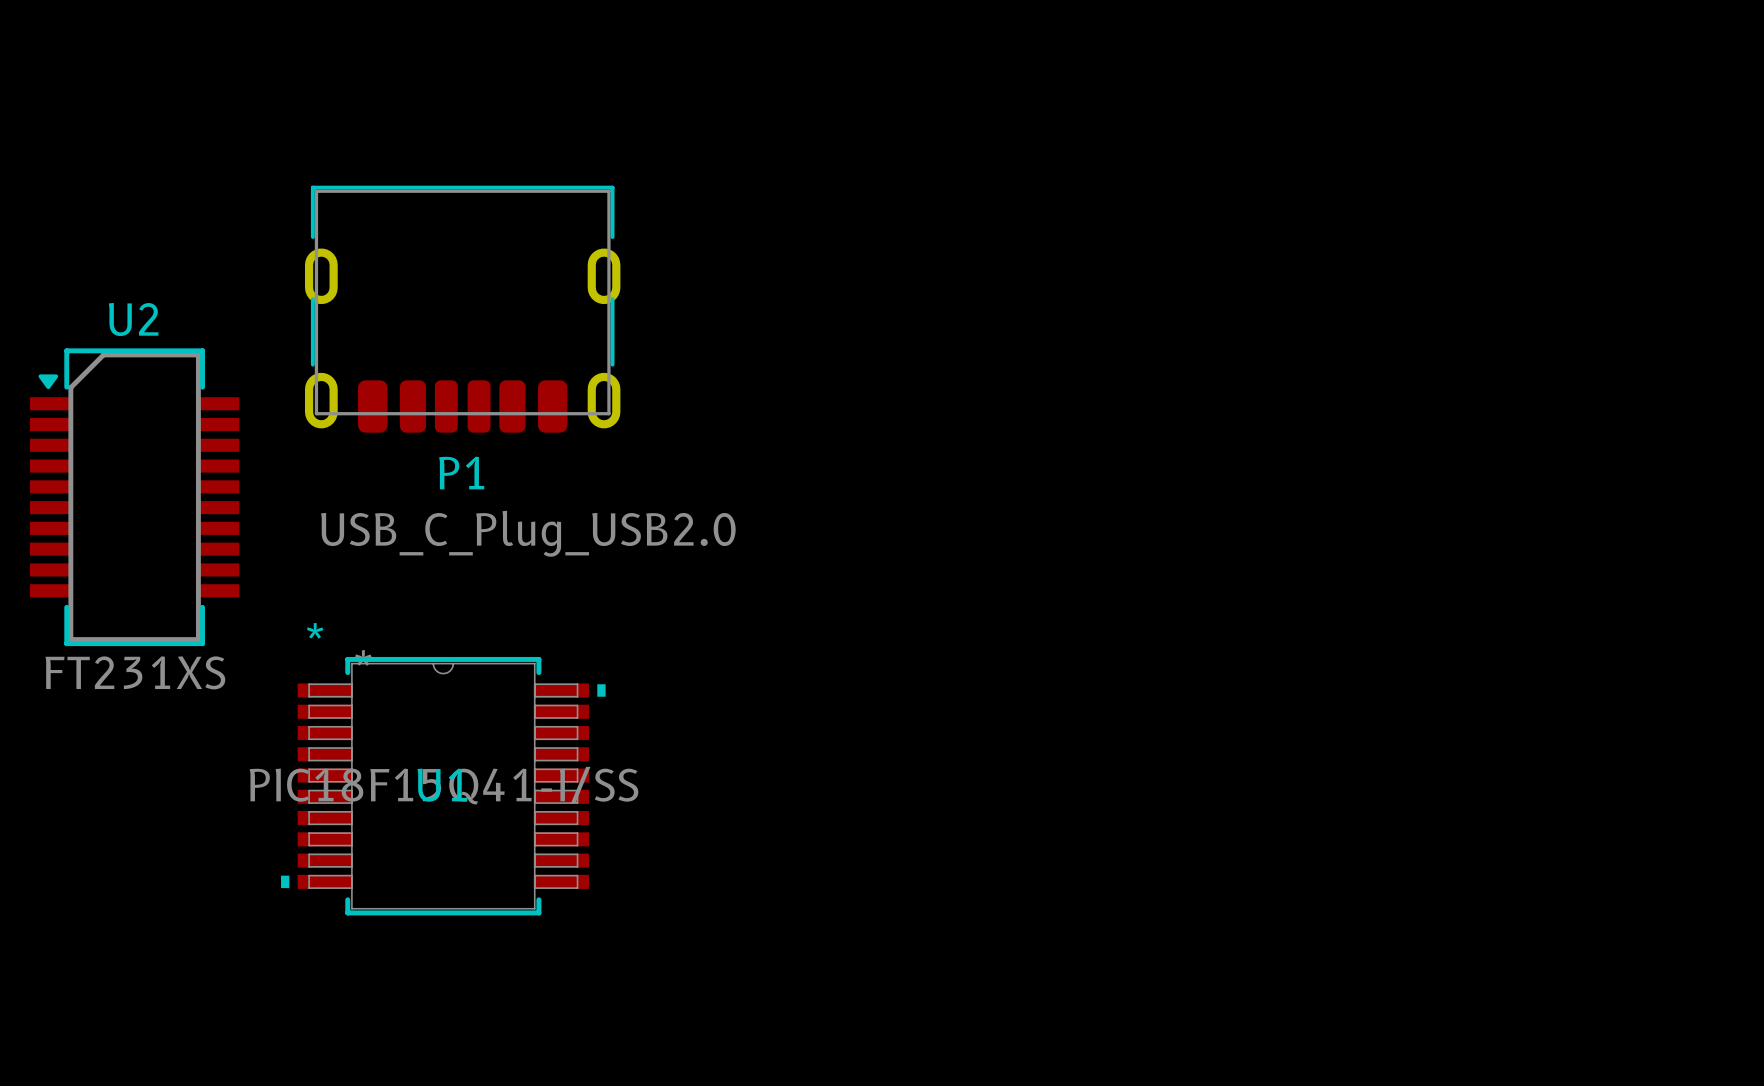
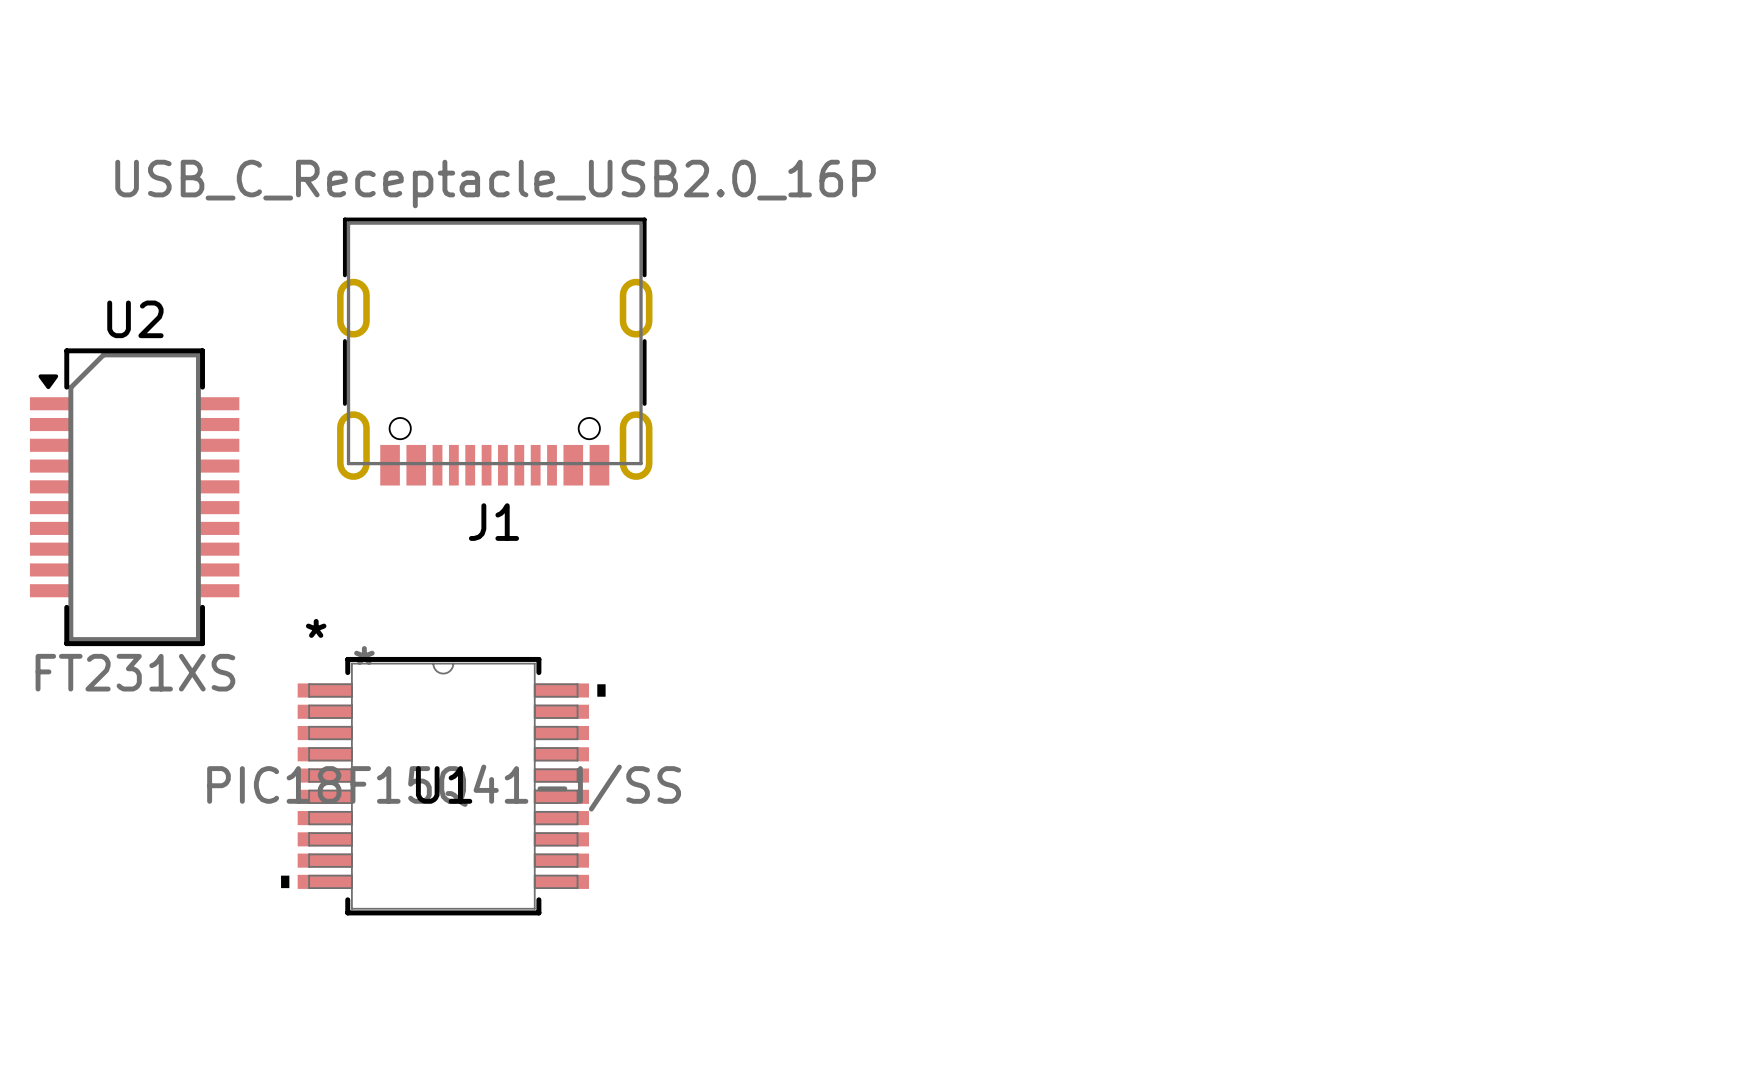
P1: USB_C_Plug_USB2.0 (462, 309) -> none
J1: none -> USB_C_Receptacle_USB2.0_16P (494, 351)

